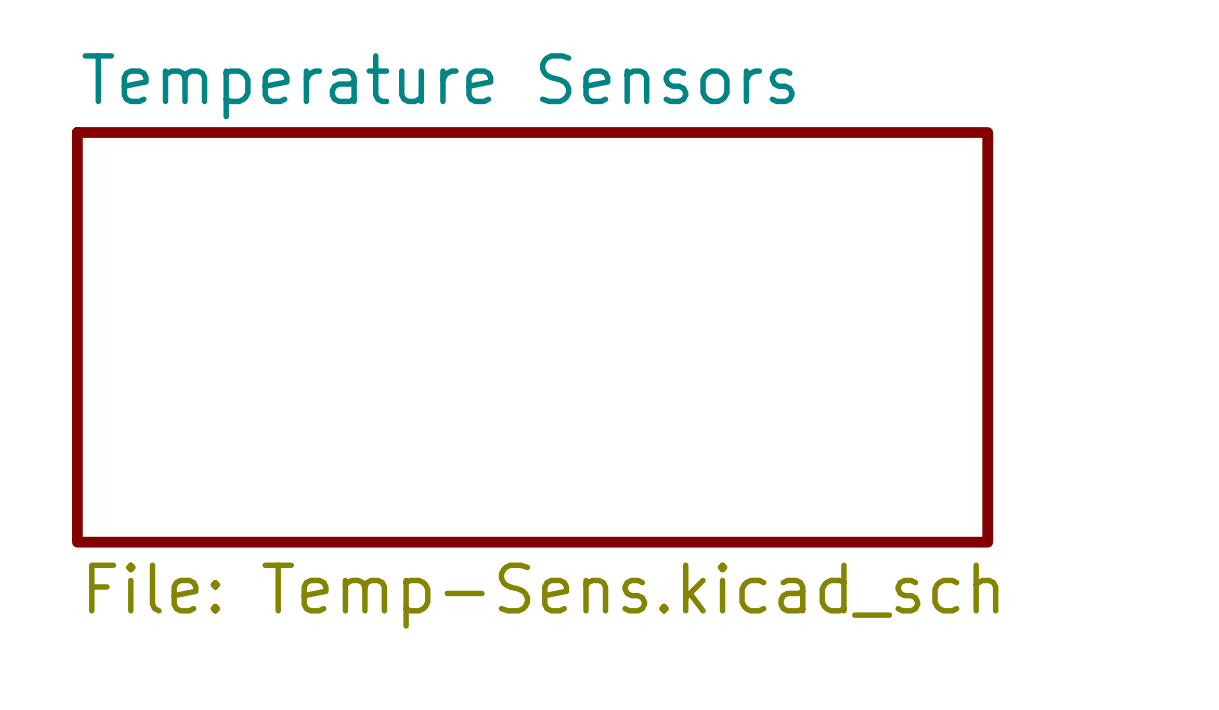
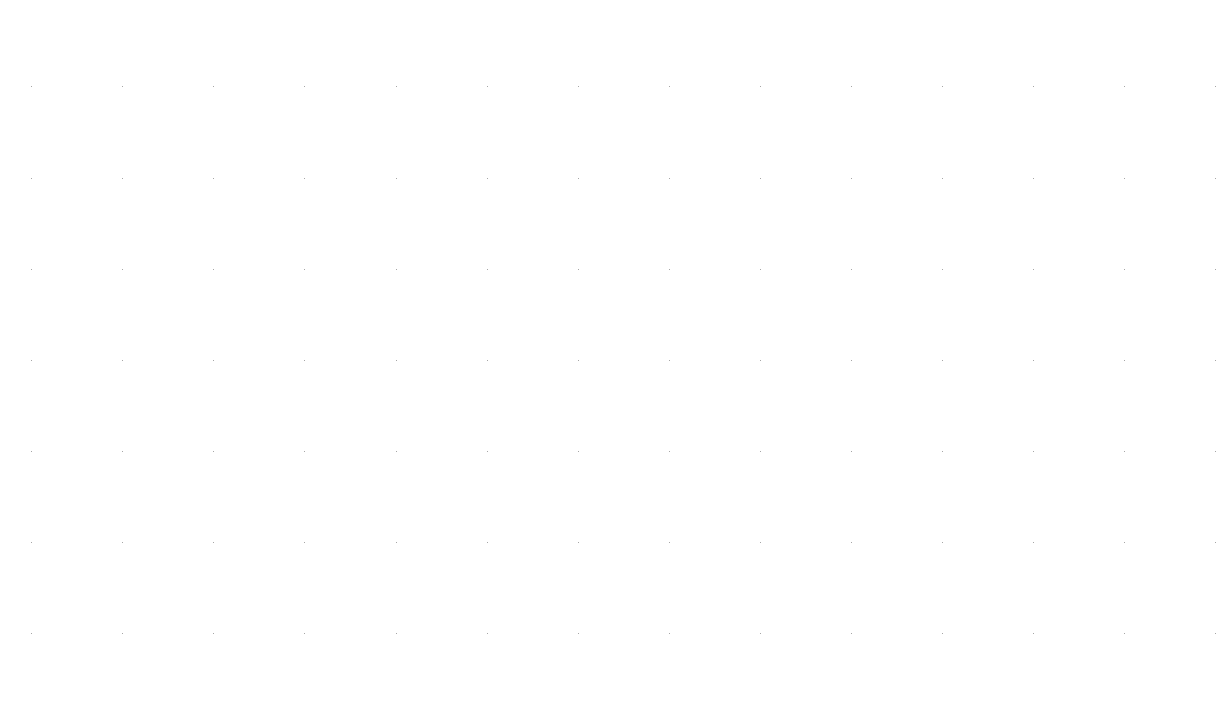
sheet Temperature Sensors: File: Temp-Sens.kicad_sch (532, 337) -> none

